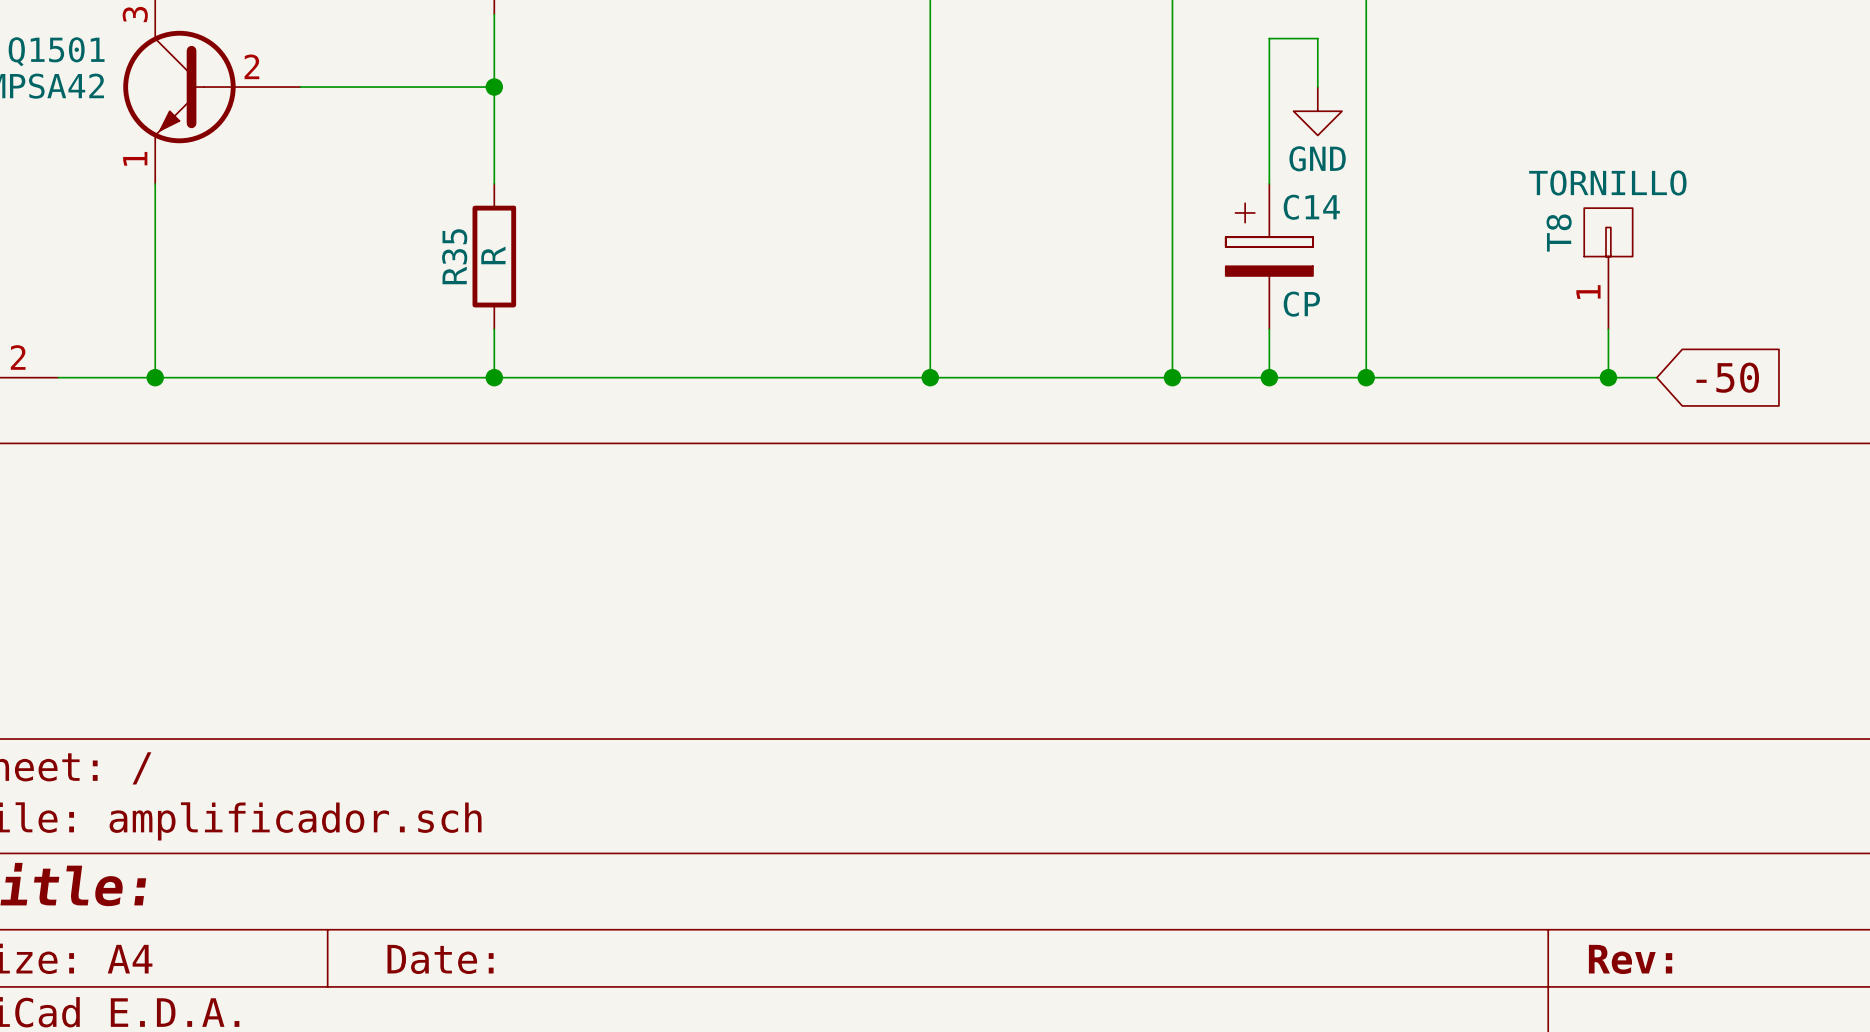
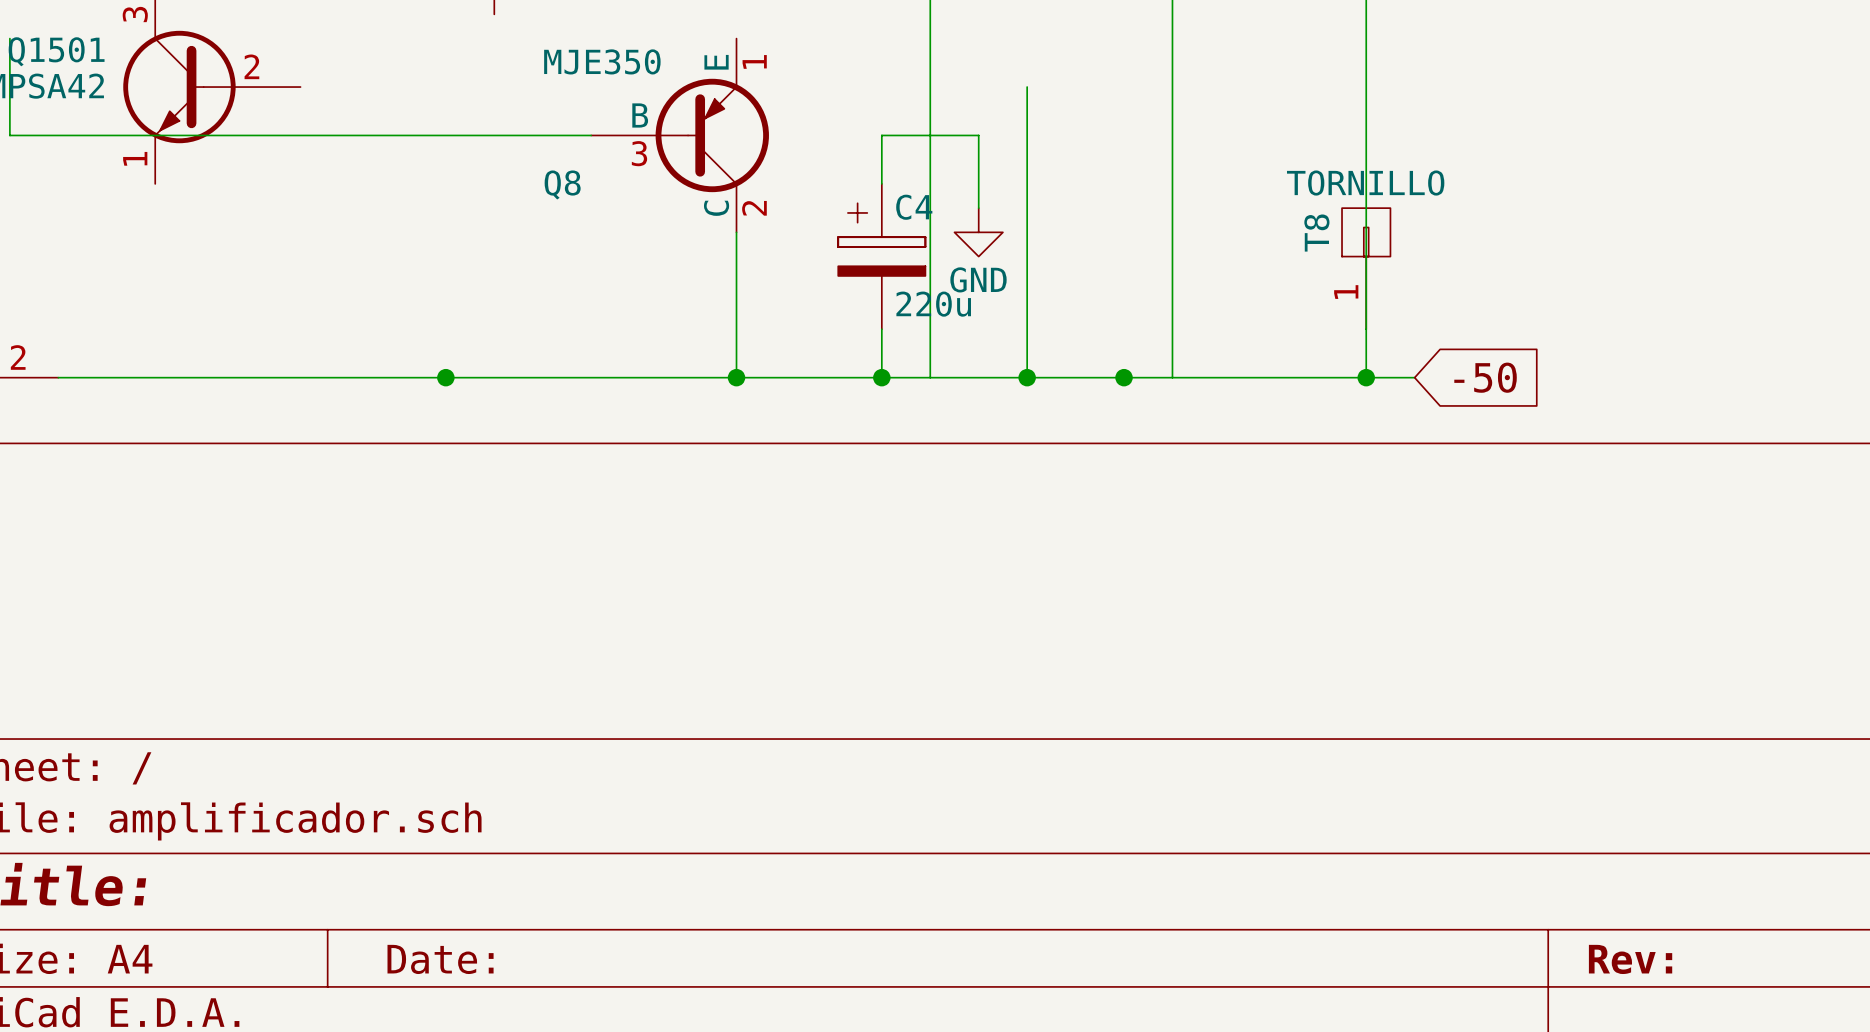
wire: (494, 14) (494, 183) -> none
wire: none -> (9, 38) (9, 135) (591, 135)
wire: (300, 87) (494, 87) -> none
junction: (494, 87) -> none
wire: none -> (1027, 87) (1027, 377)
wire: (1317, 87) (1317, 38) (1269, 38) (1269, 183) -> none
power symbol: GND (1317, 111) -> none
Q8: none -> MJE350 (680, 135)
wire: (155, 183) (155, 377) -> none
wire: none -> (881, 183) (881, 135) (978, 135) (978, 208)
wire: none -> (736, 232) (736, 377)
power symbol: none -> GND (978, 232)
R35: R (494, 256) -> none
C4: none -> 220u (881, 256)
C14: CP (1269, 256) -> none
T8 position: (1608, 268) -> (1366, 268)
wire: (494, 329) (494, 377) -> (881, 329) (881, 377)
wire: (1269, 329) (1269, 377) -> none
wire: (1608, 329) (1608, 377) -> none
junction: (155, 377) -> none
junction position: (494, 377) -> (445, 377)
junction: none -> (736, 377)
junction: none -> (881, 377)
junction: (930, 377) -> none
junction: none -> (1027, 377)
junction position: (1172, 377) -> (1124, 377)
junction: (1269, 377) -> none
wire: (1414, 377) (1656, 377) -> none
junction: (1608, 377) -> none
global label position: -50 (1727, 377) -> -50 (1485, 377)

